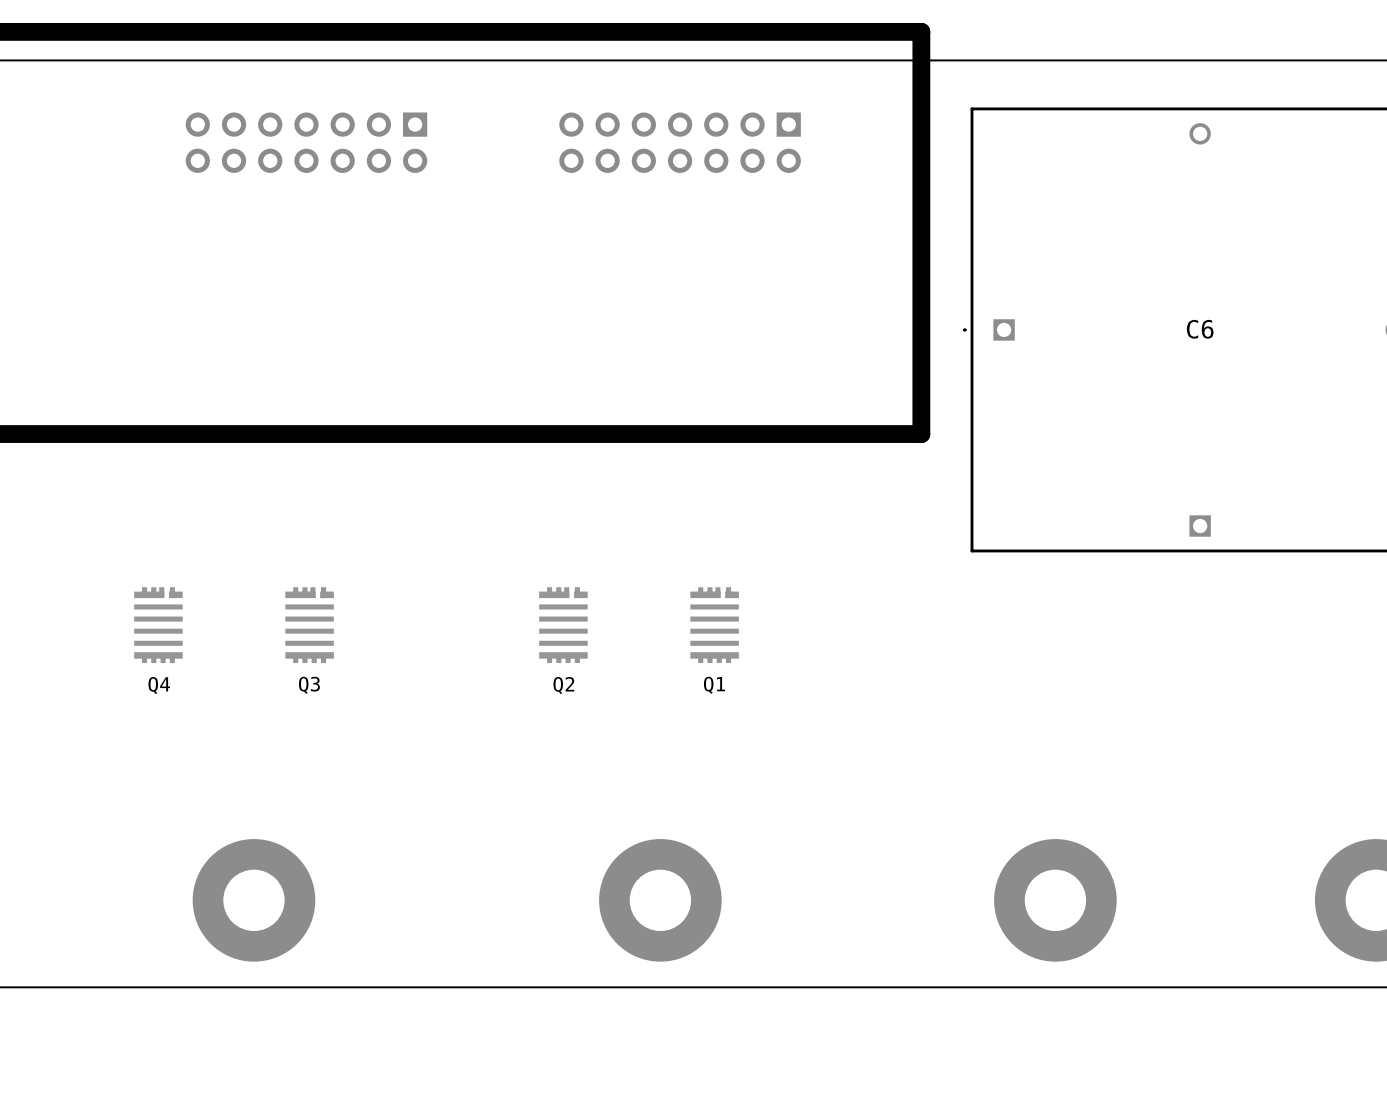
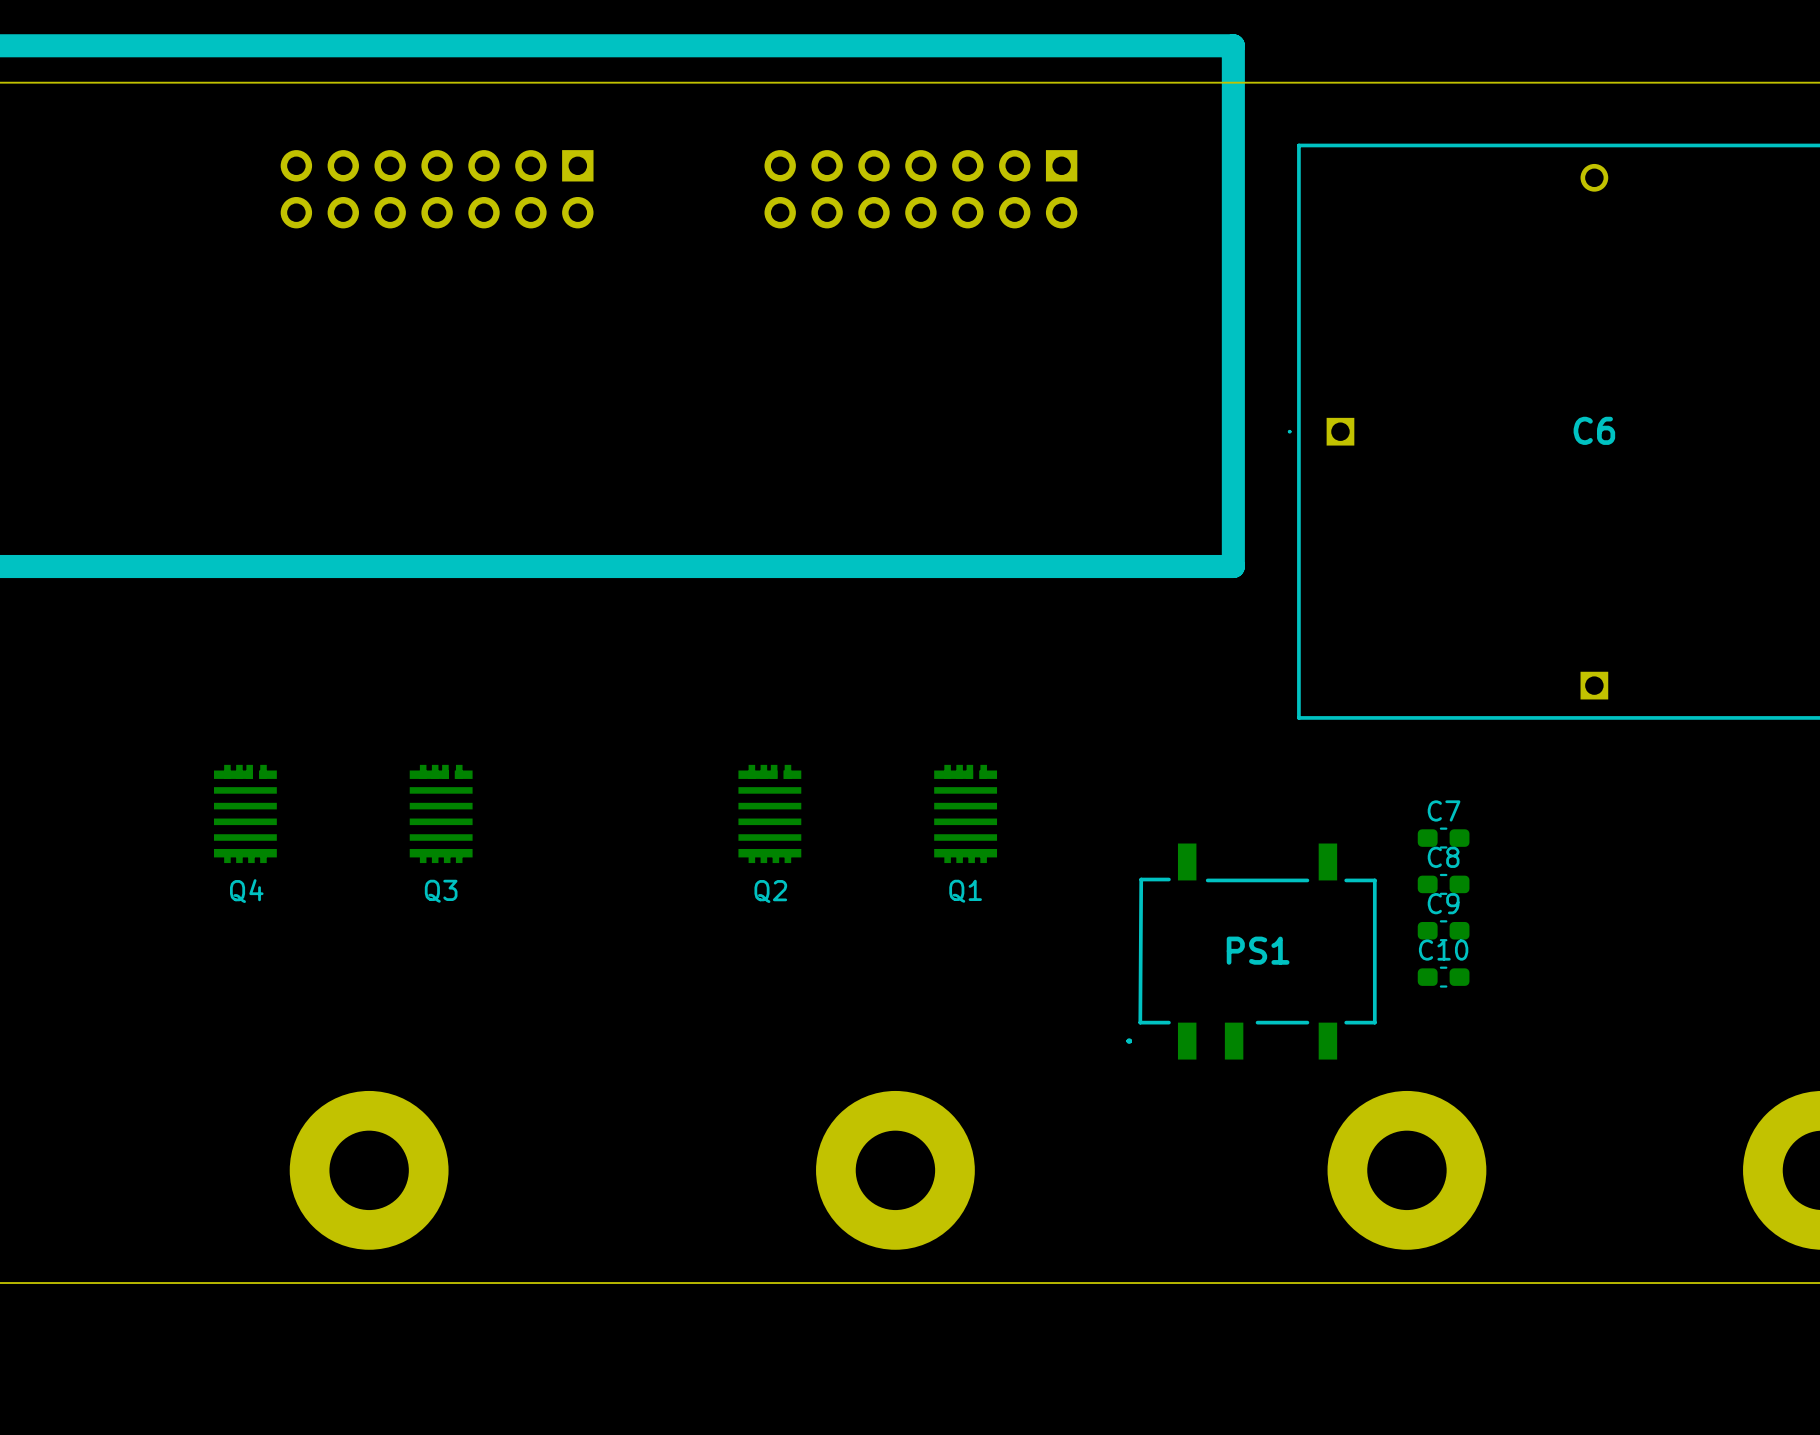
C7: none -> (1443, 838)
C8: none -> (1443, 884)
C9: none -> (1443, 930)
PS1: none -> (1251, 951)
C10: none -> (1443, 977)

